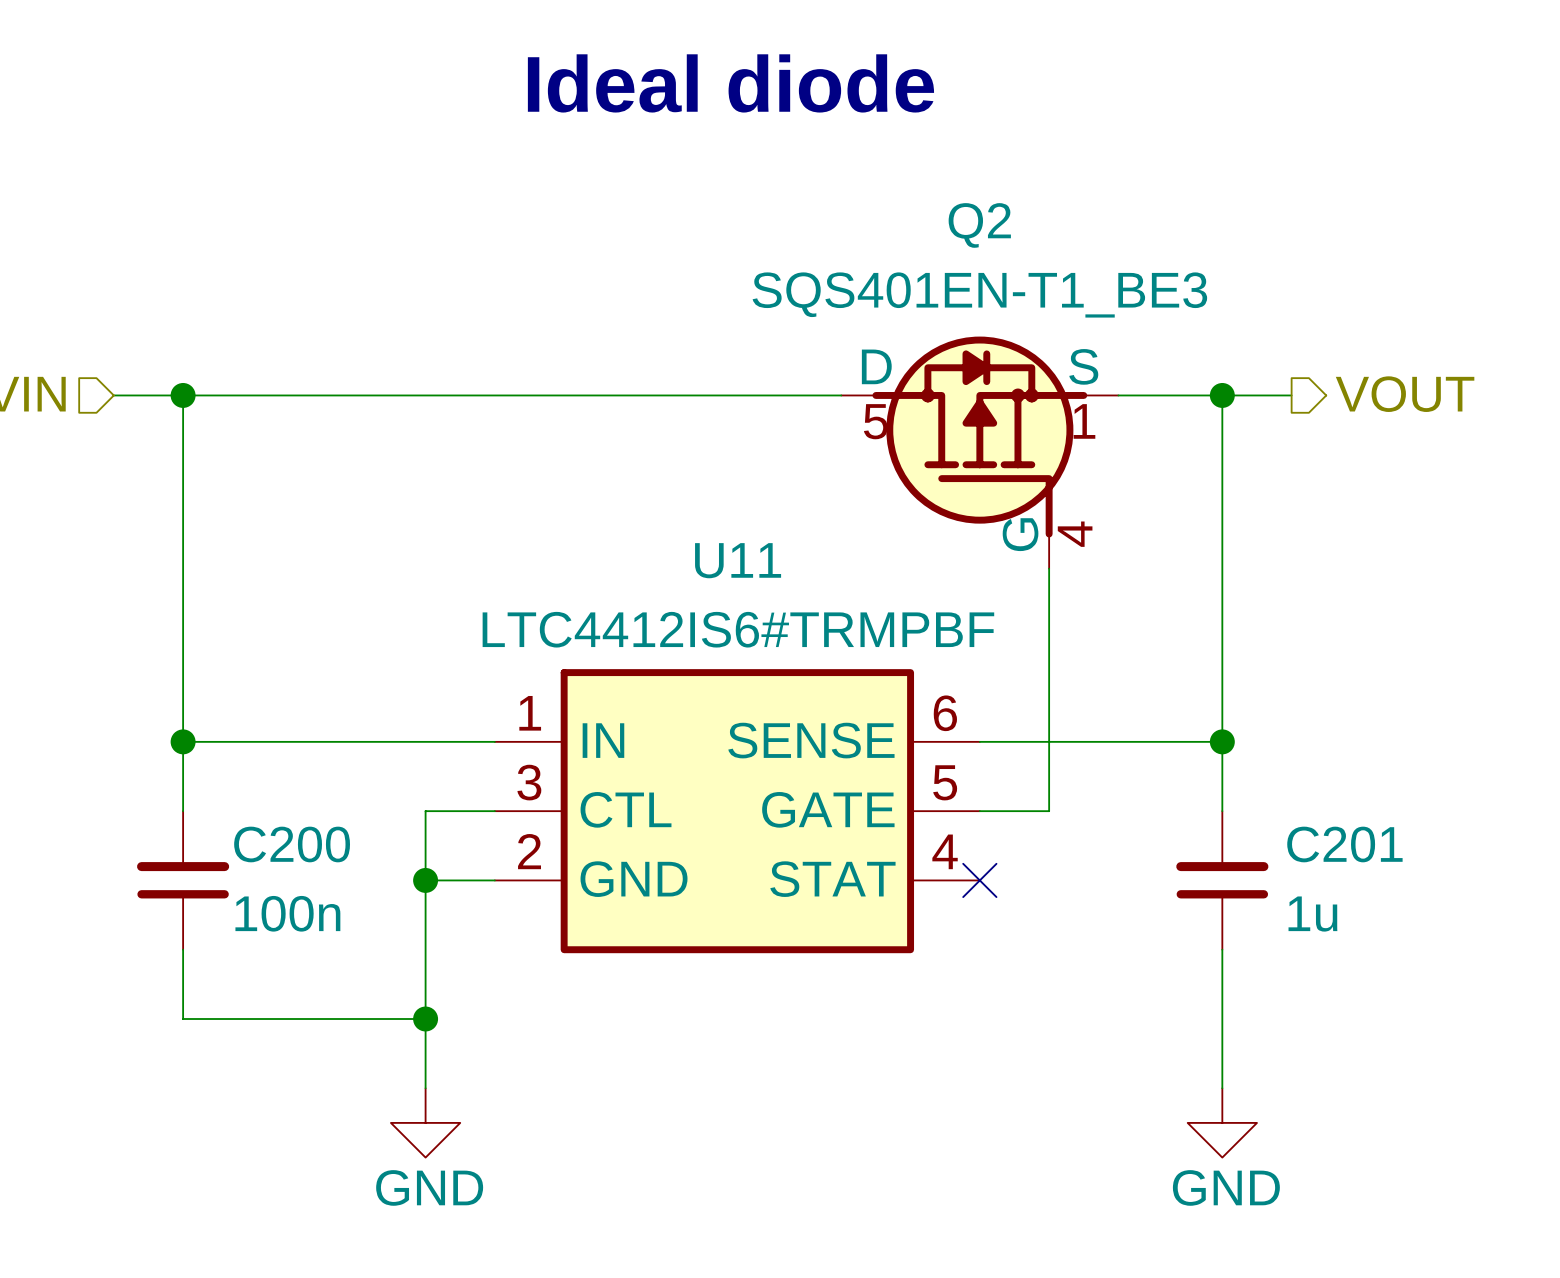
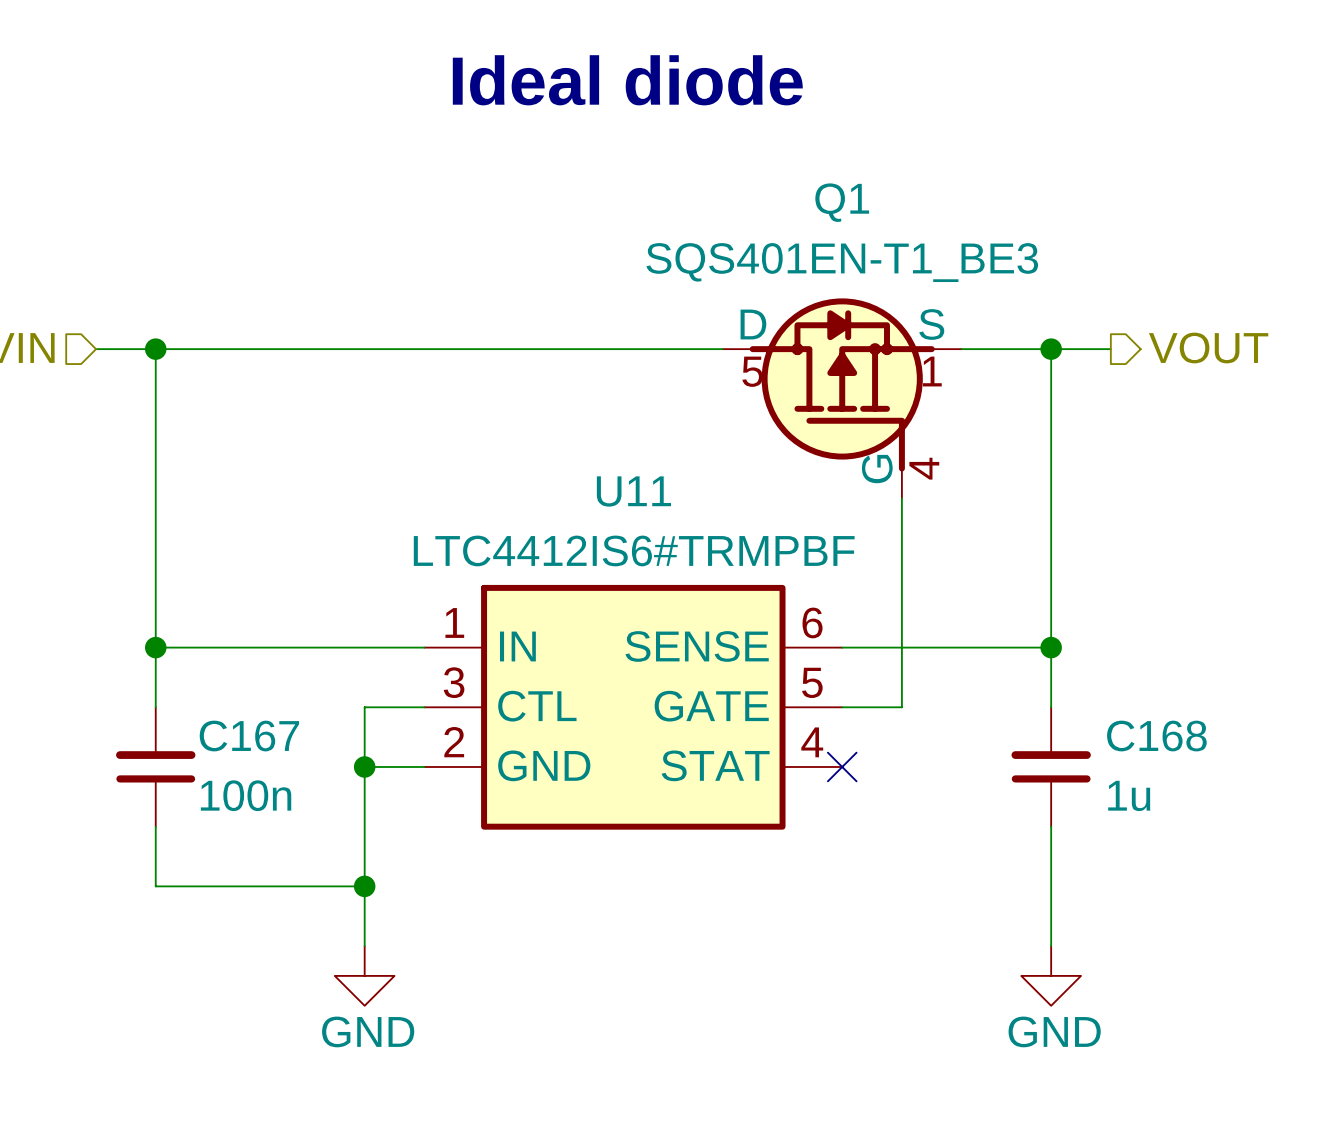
Q2 name: Q2 (979, 225) -> Q1 (842, 202)
C200 name: C200 (292, 844) -> C167 (249, 736)
C201 name: C201 (1344, 844) -> C168 (1156, 736)

